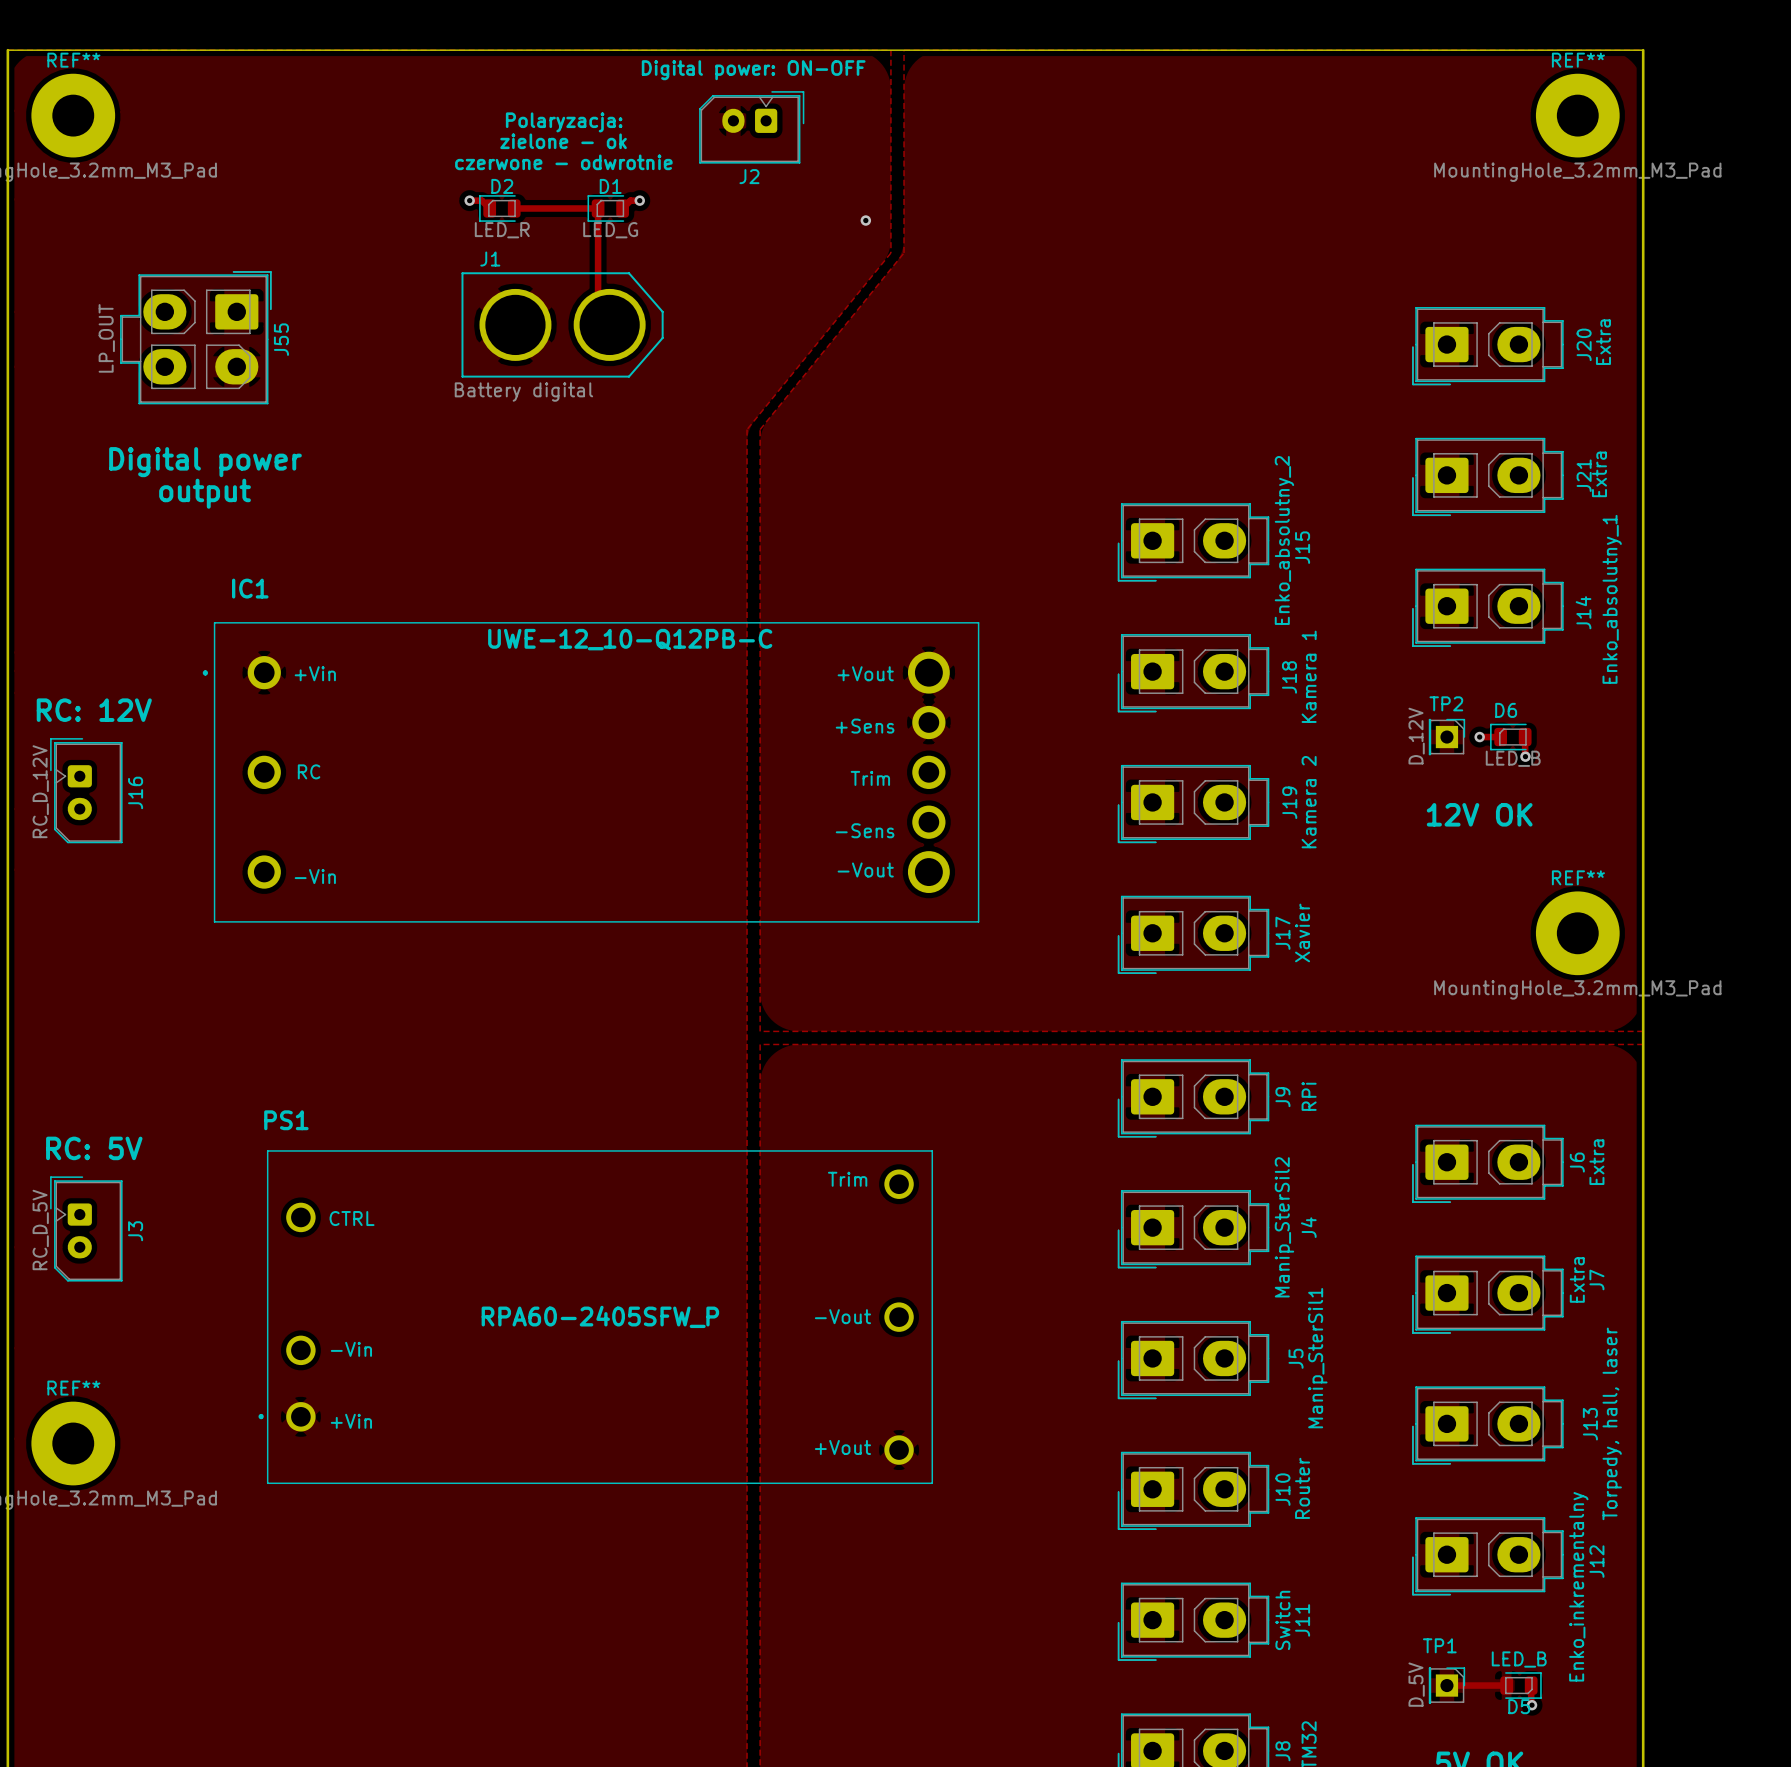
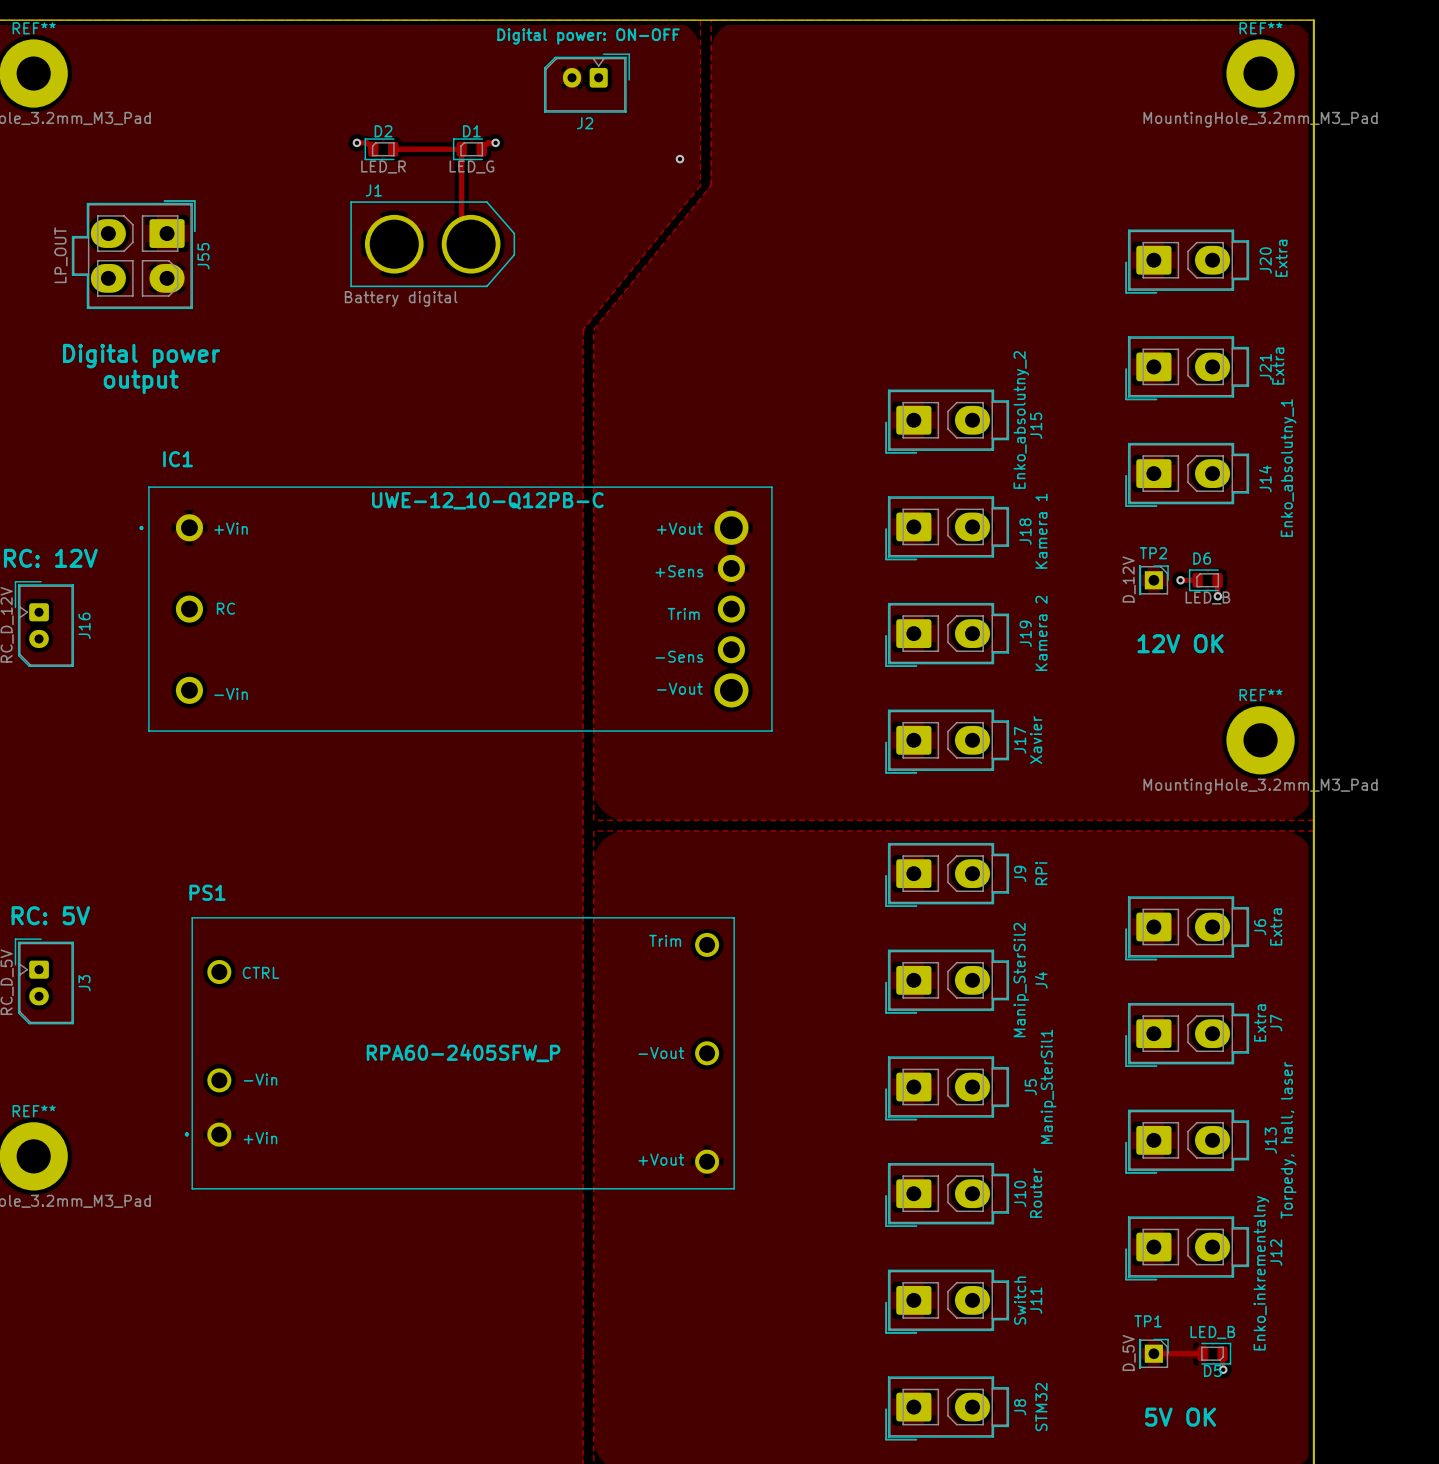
text: Polaryzacja: (564, 122) -> none
text: zielone - ok (563, 141) -> none
text: czerwone - odwrotnie (563, 162) -> none

